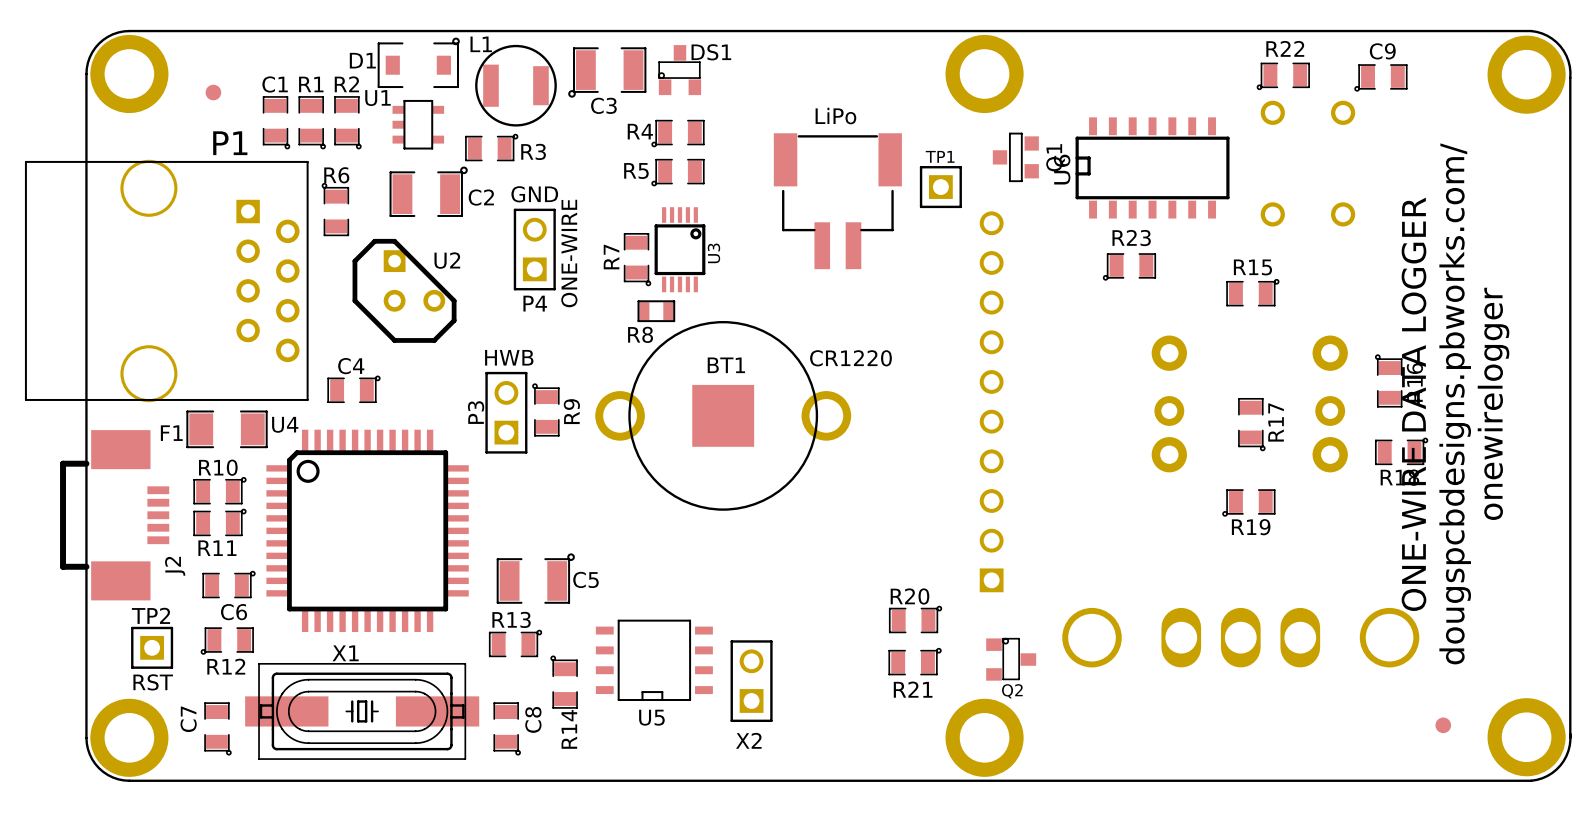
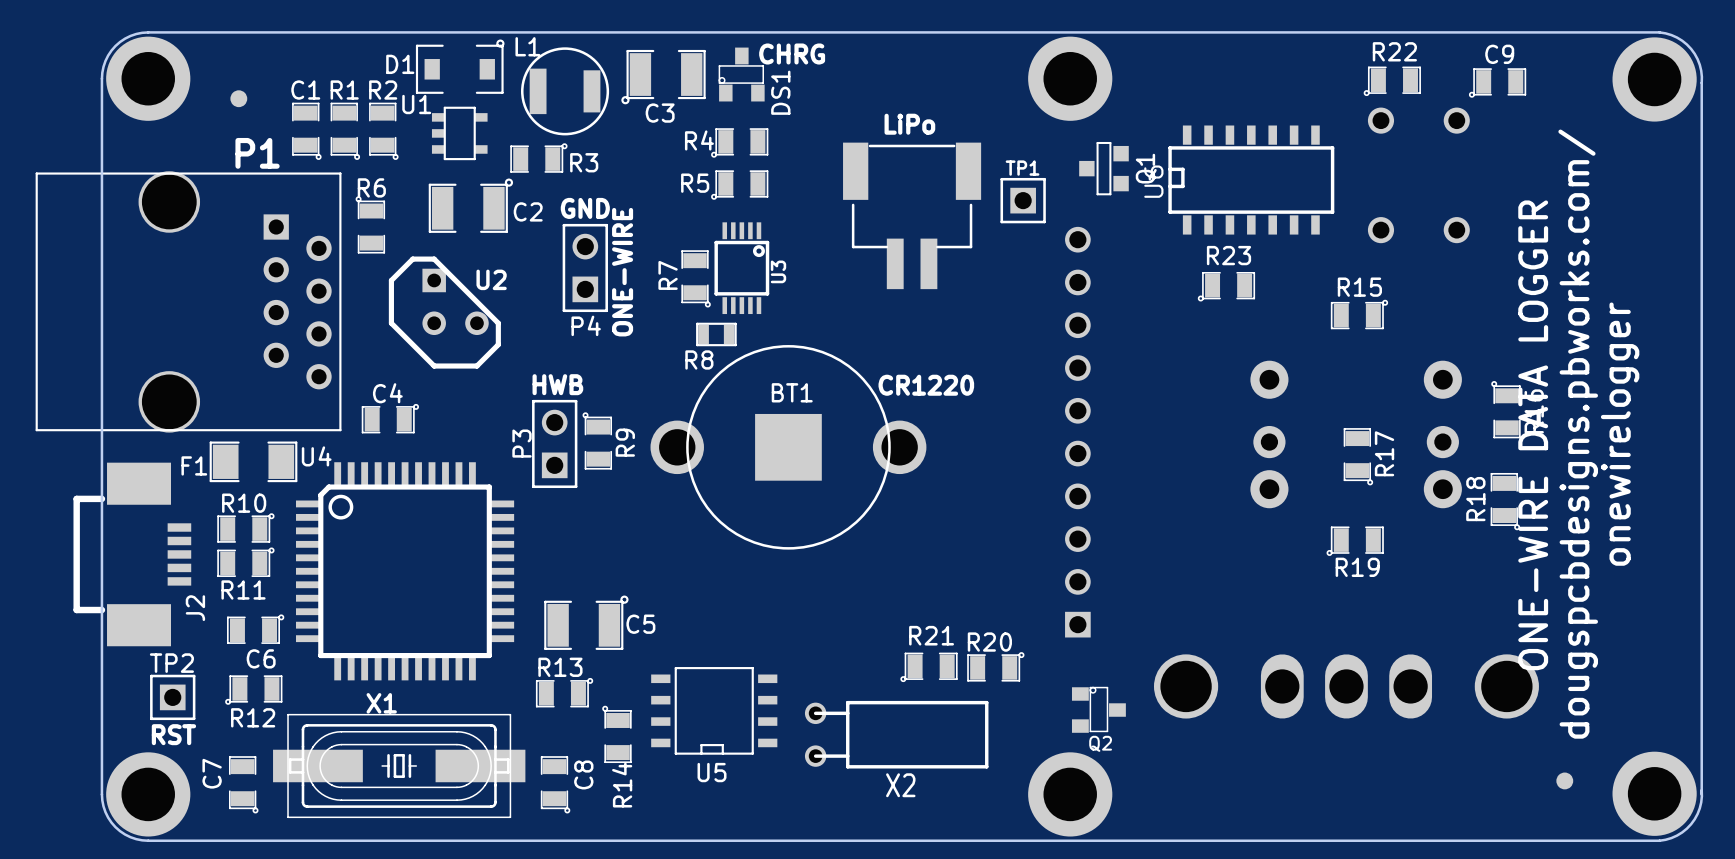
text: none -> CHRG (792, 54)
DS1 name rotation: 0° (711, 52) -> 90° counterclockwise (780, 92)
R18 rotation: 0° (1401, 451) -> 90° clockwise (1505, 501)
X2 footprint: [730, 640, 773, 723] -> [804, 700, 989, 769]
R21 rotation: 0° (915, 661) -> 180° (928, 667)
R21 position: (915, 661) -> (928, 667)

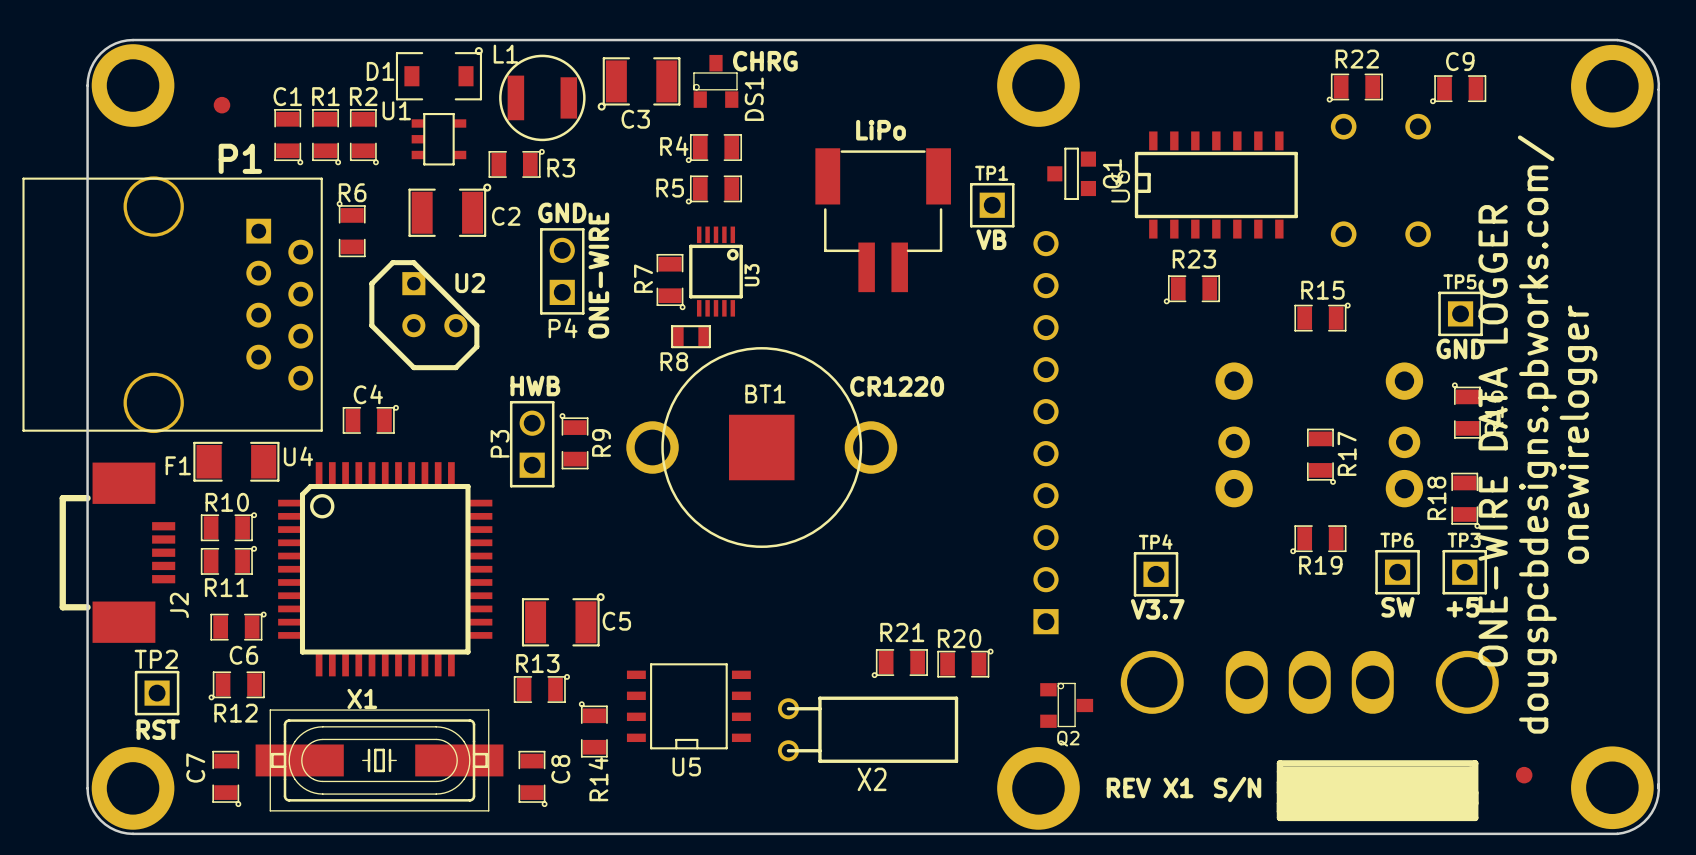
text: none -> VB (991, 239)
TP5: none -> (1460, 313)
text: none -> GND (1460, 348)
TP6: none -> (1397, 572)
TP3: none -> (1464, 572)
TP4: none -> (1156, 574)
text: none -> SW (1397, 607)
text: none -> +5 (1463, 607)
text: none -> V3.7 (1157, 609)
drawing: none -> [1276, 760, 1479, 822]
text: none -> REV X1 (1150, 787)
text: none -> S/N (1237, 789)

